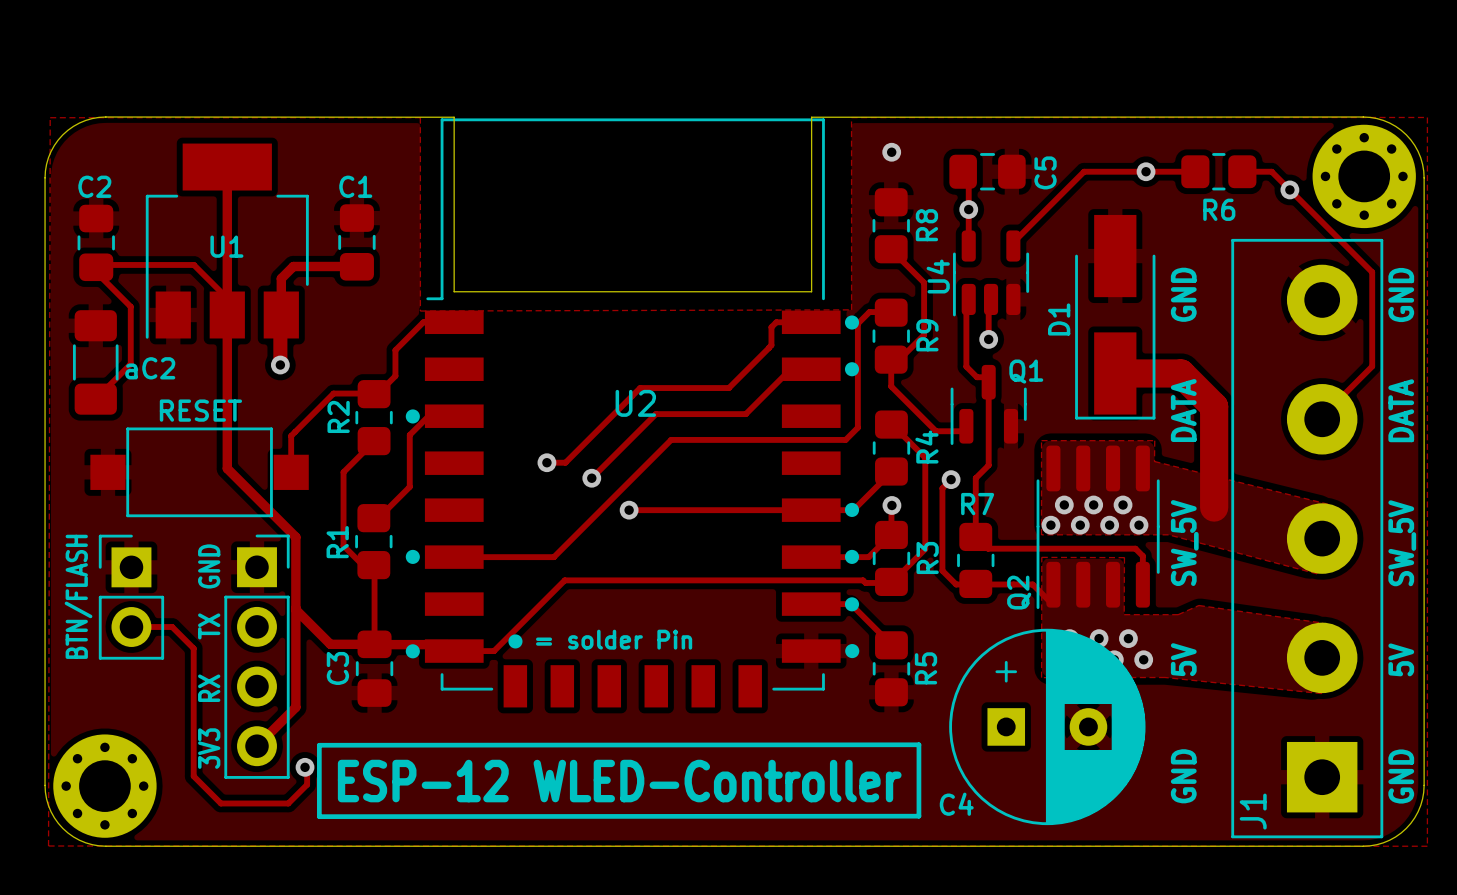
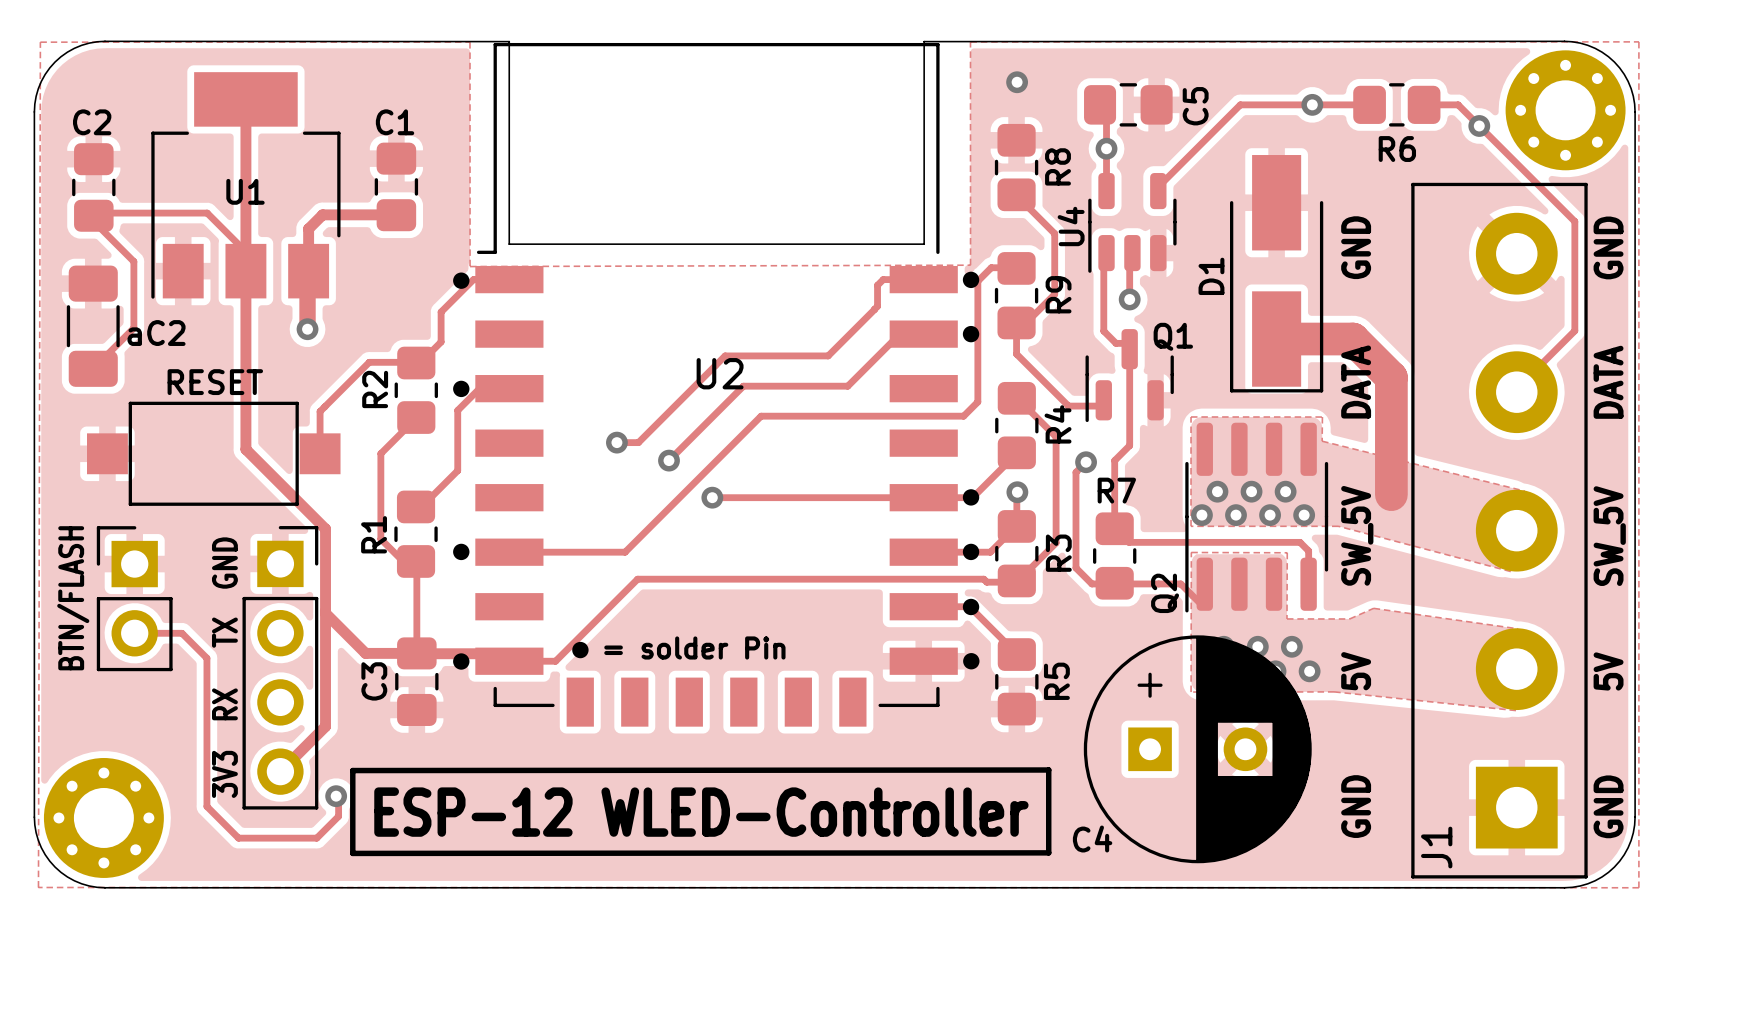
drawing: none -> [453, 272, 470, 289]

